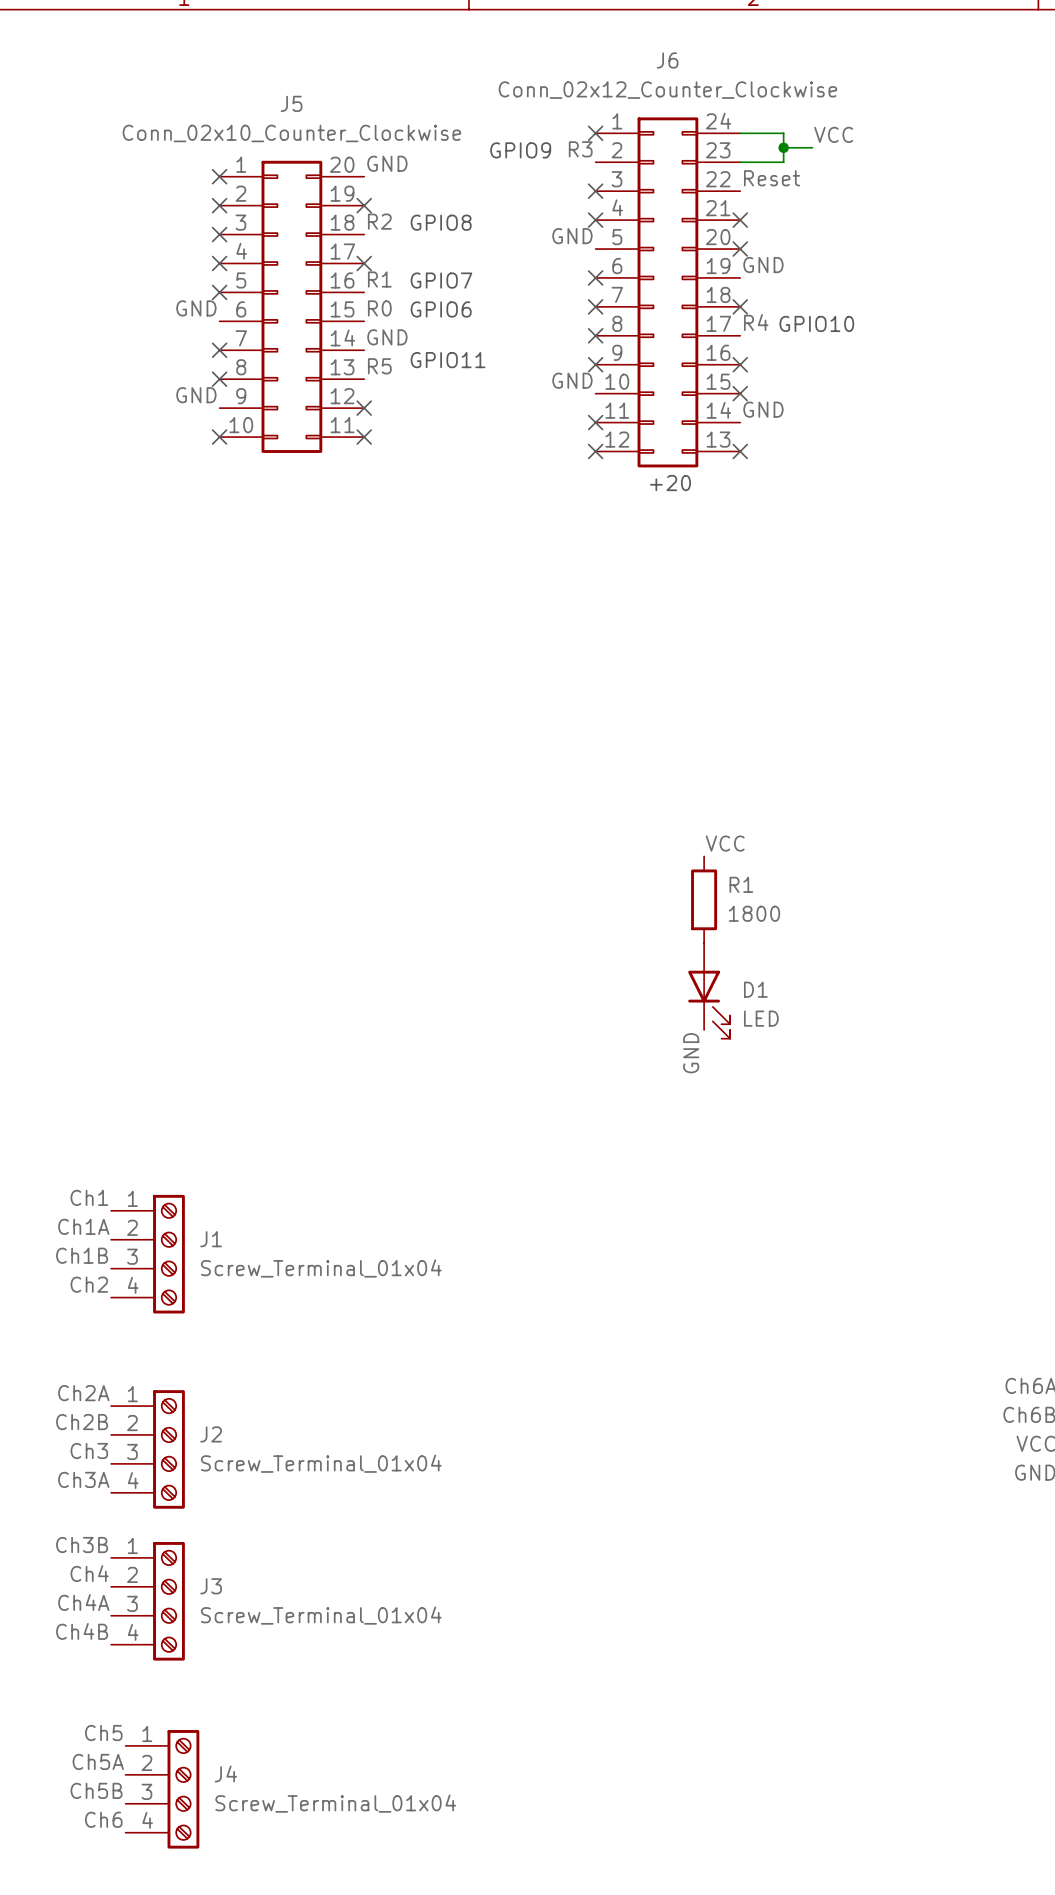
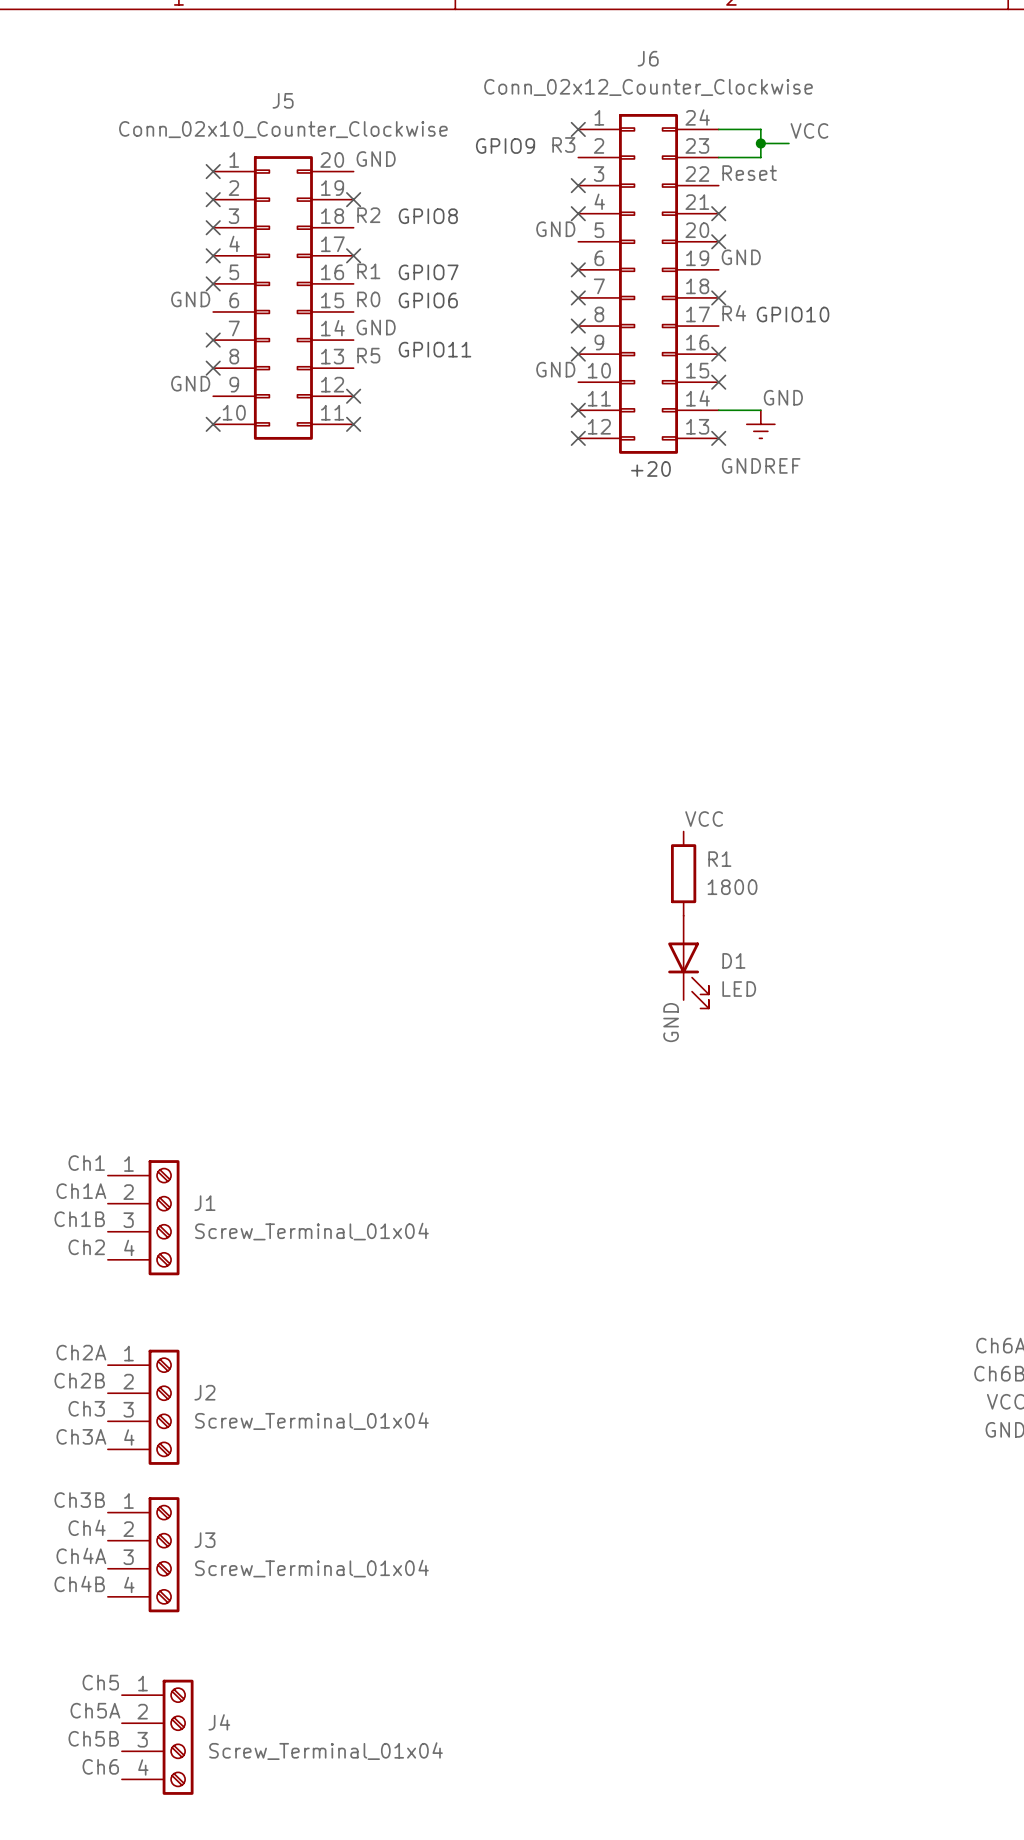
label position: GND (763, 409) -> GND (783, 397)
wire: none -> (718, 410) (760, 410)
power symbol: none -> GNDREF (760, 424)

